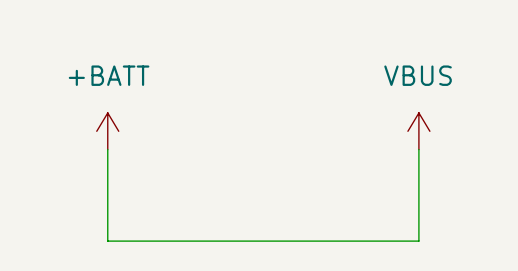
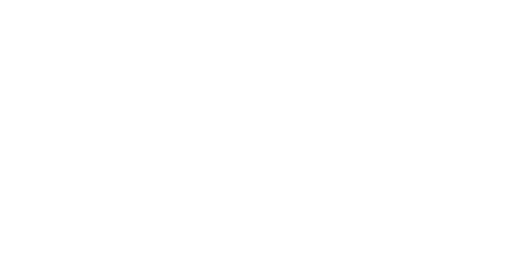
power symbol: +BATT (107, 131) -> none
power symbol: VBUS (418, 131) -> none
wire: (107, 149) (107, 241) (418, 241) (418, 149) -> none

